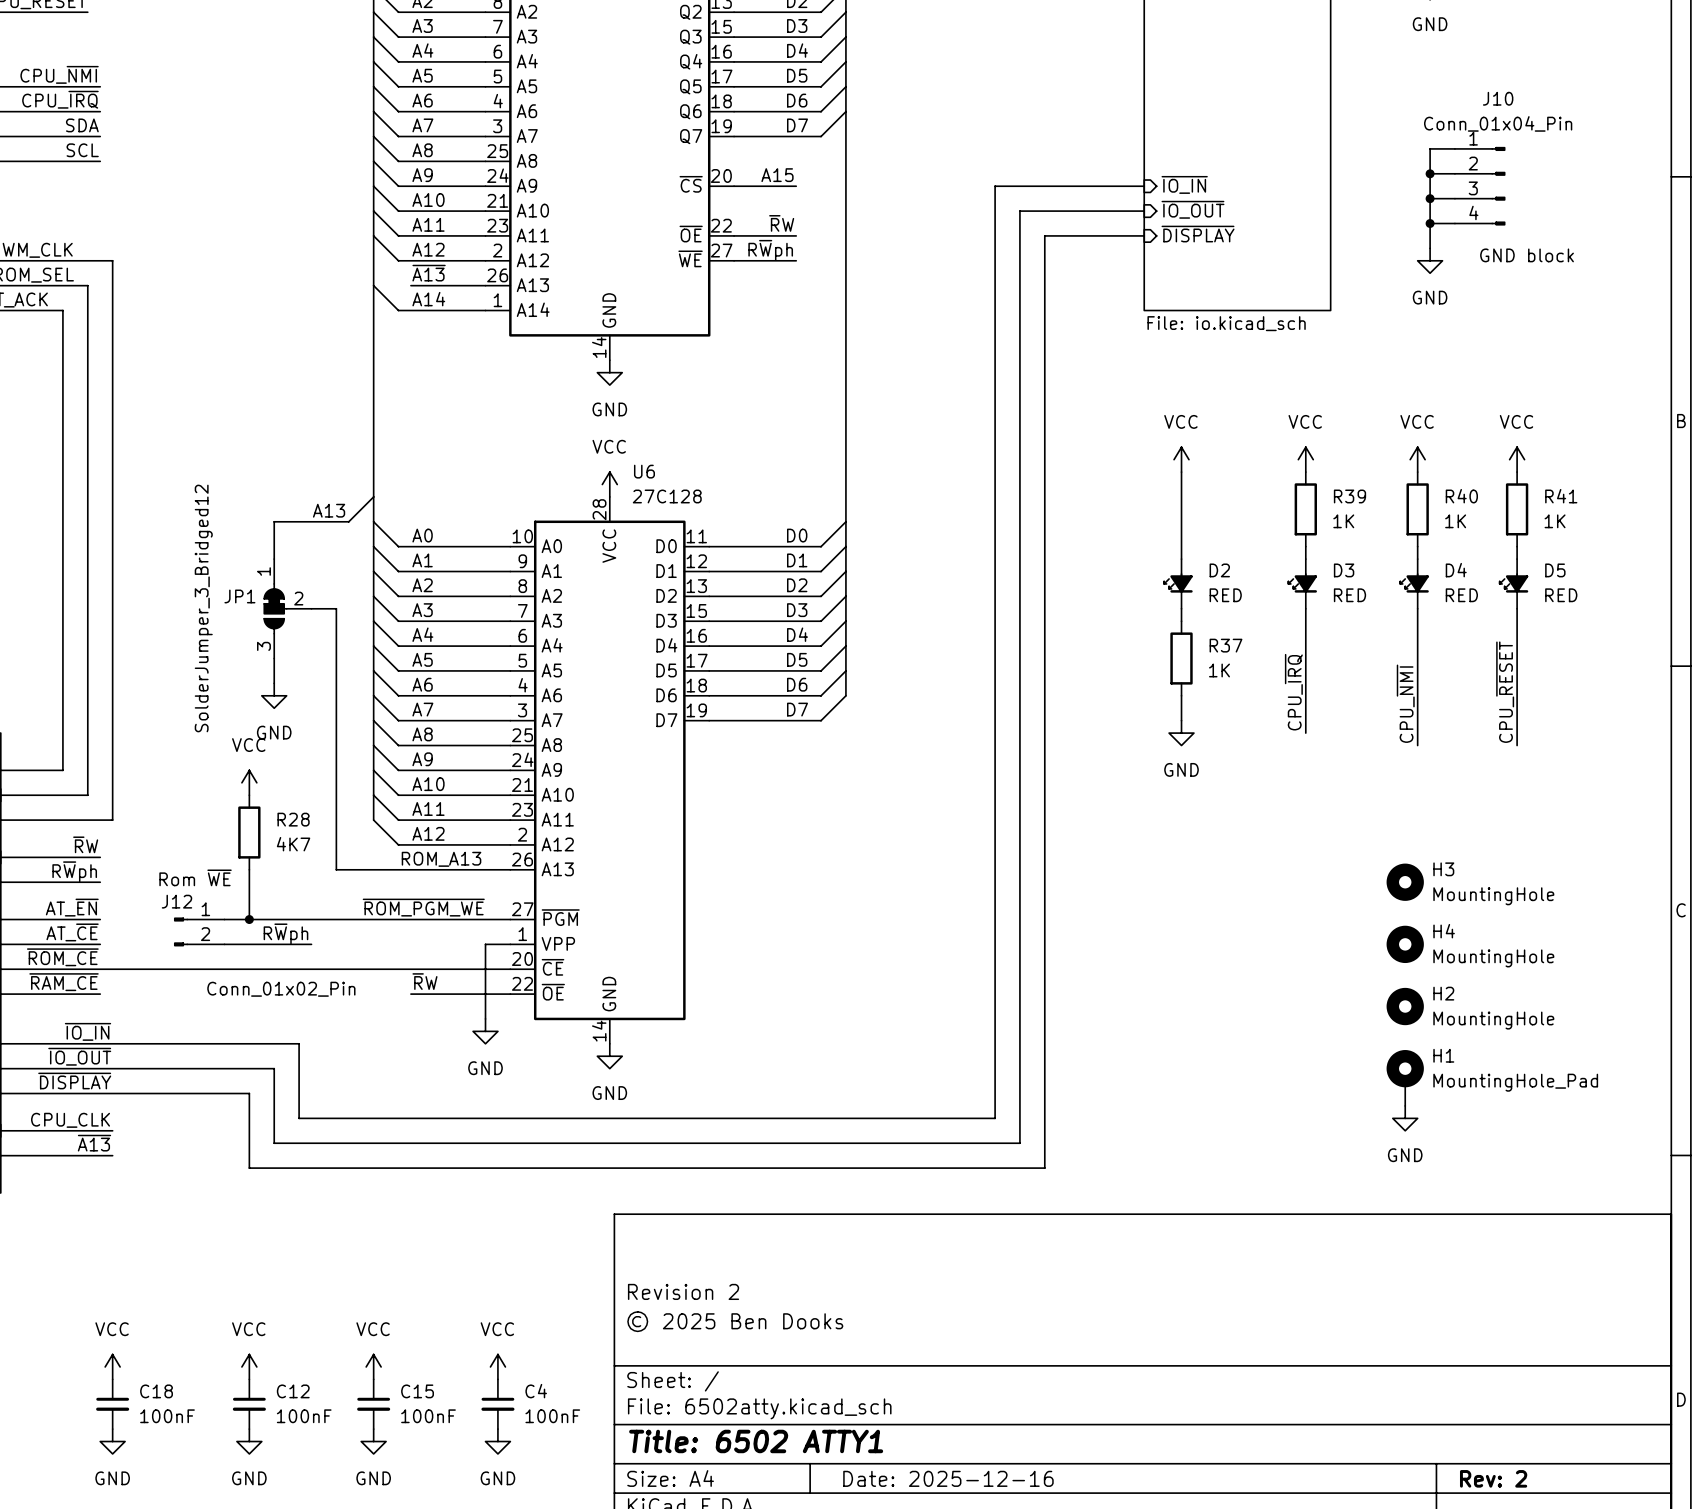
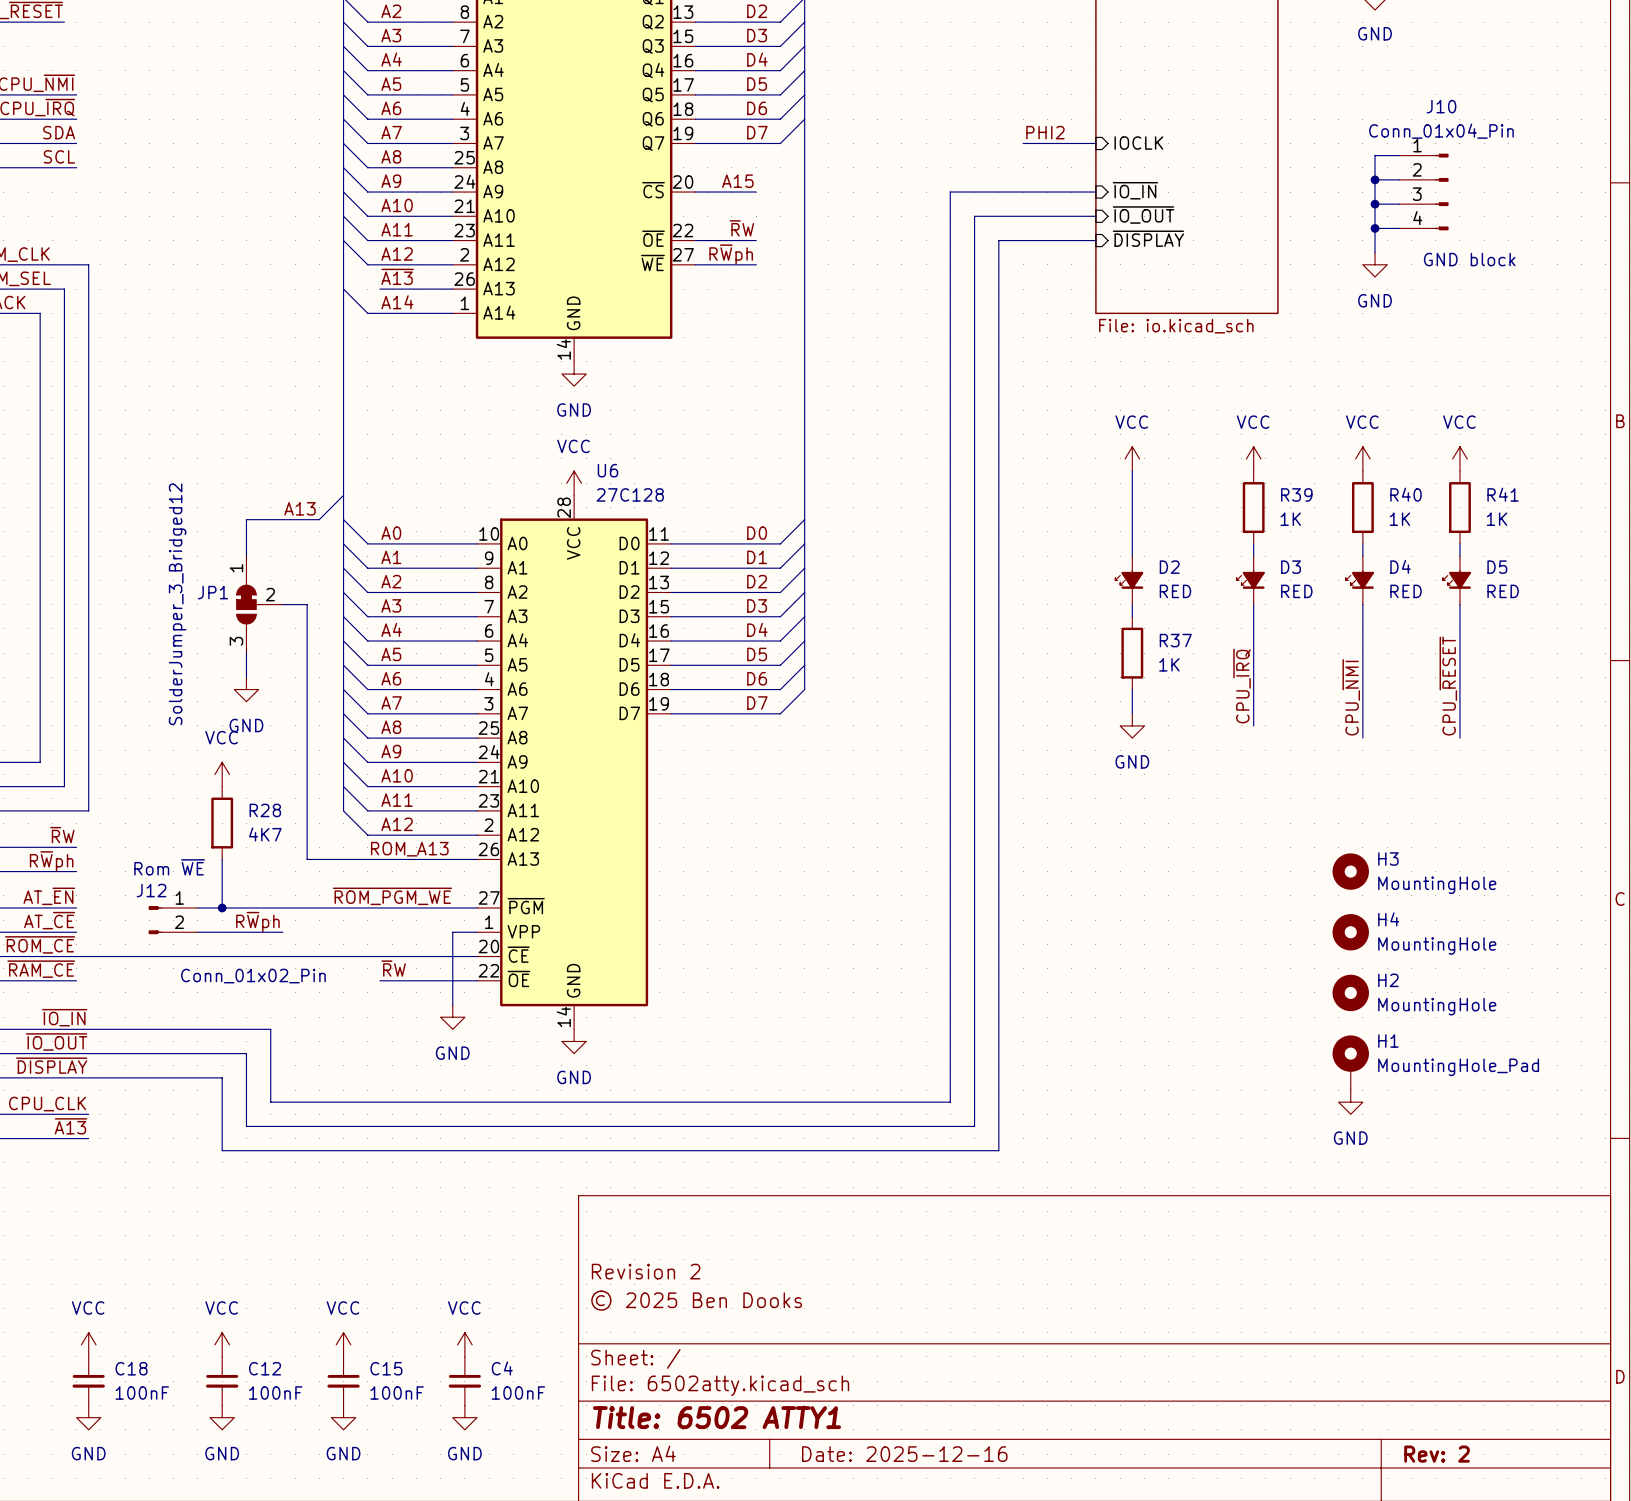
label: none -> PHI2 (1045, 132)
wire: none -> (1023, 143) (1095, 143)
sheet pin: none -> IOCLK (1138, 143)

